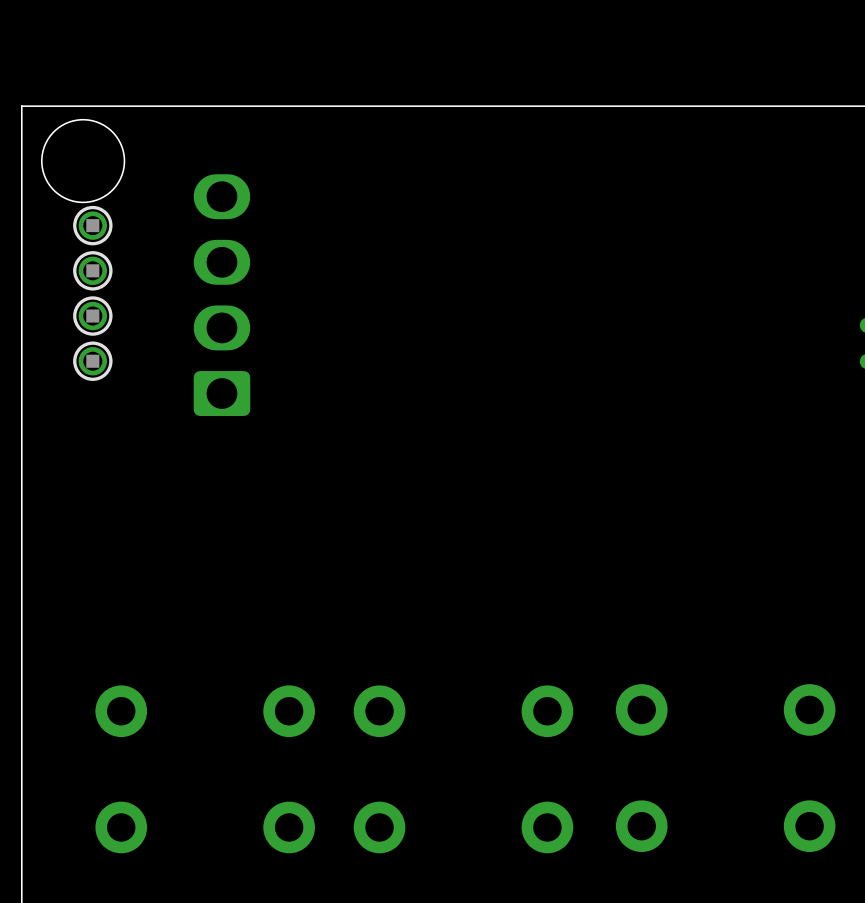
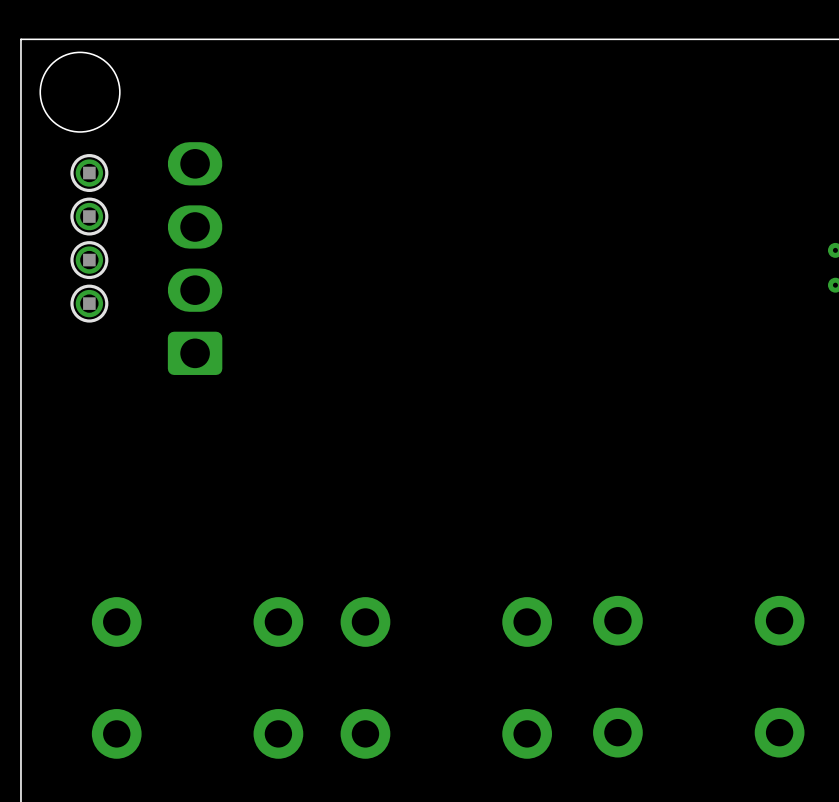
part: (92, 225) -> none
part: none -> (89, 173)
part: (92, 270) -> none
part: none -> (89, 216)
part position: (221, 295) -> (195, 258)
part: (92, 316) -> none
part: none -> (89, 260)
part: (92, 361) -> none
part: none -> (89, 303)

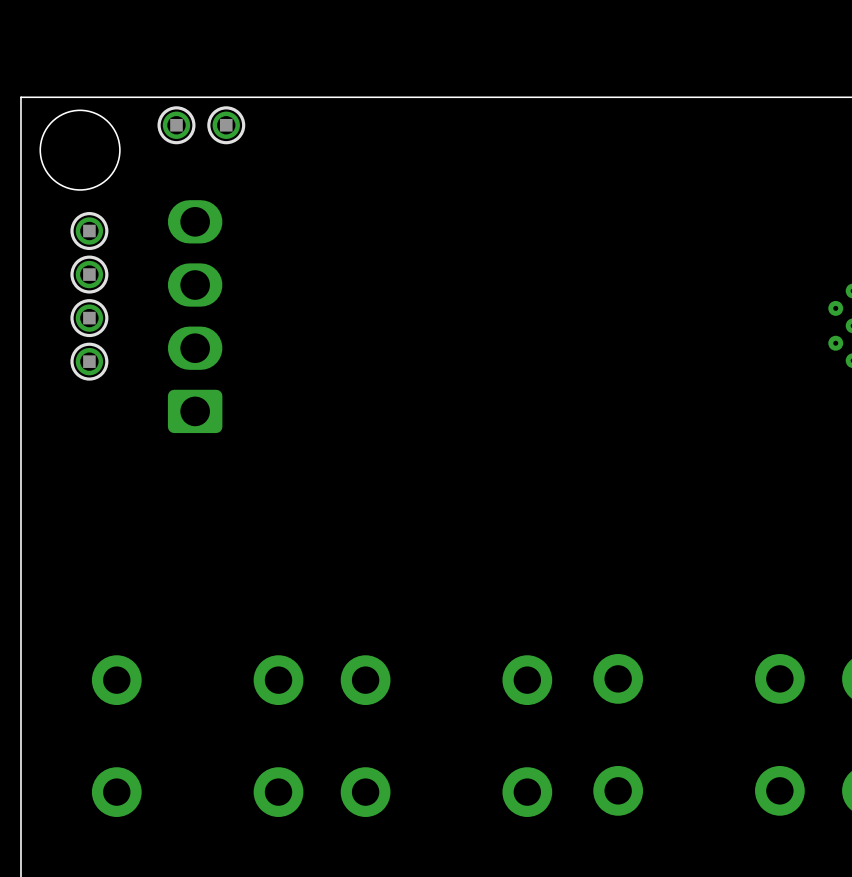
part: none -> (176, 125)
part: none -> (226, 125)

